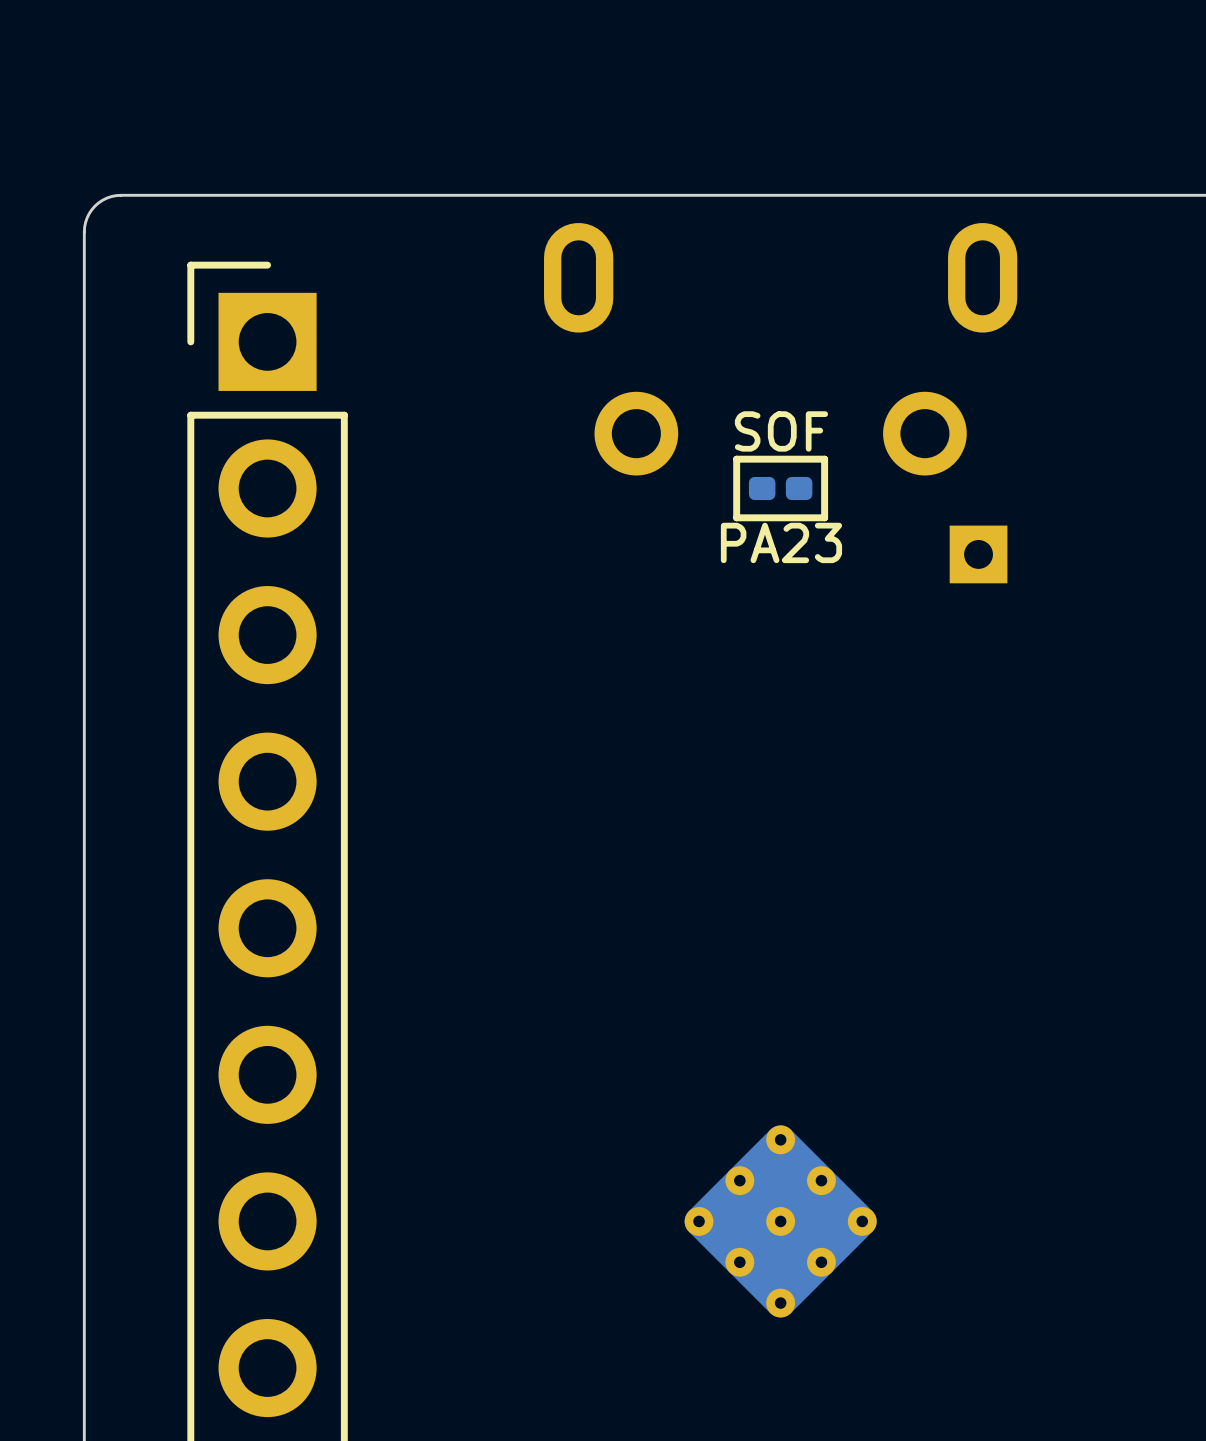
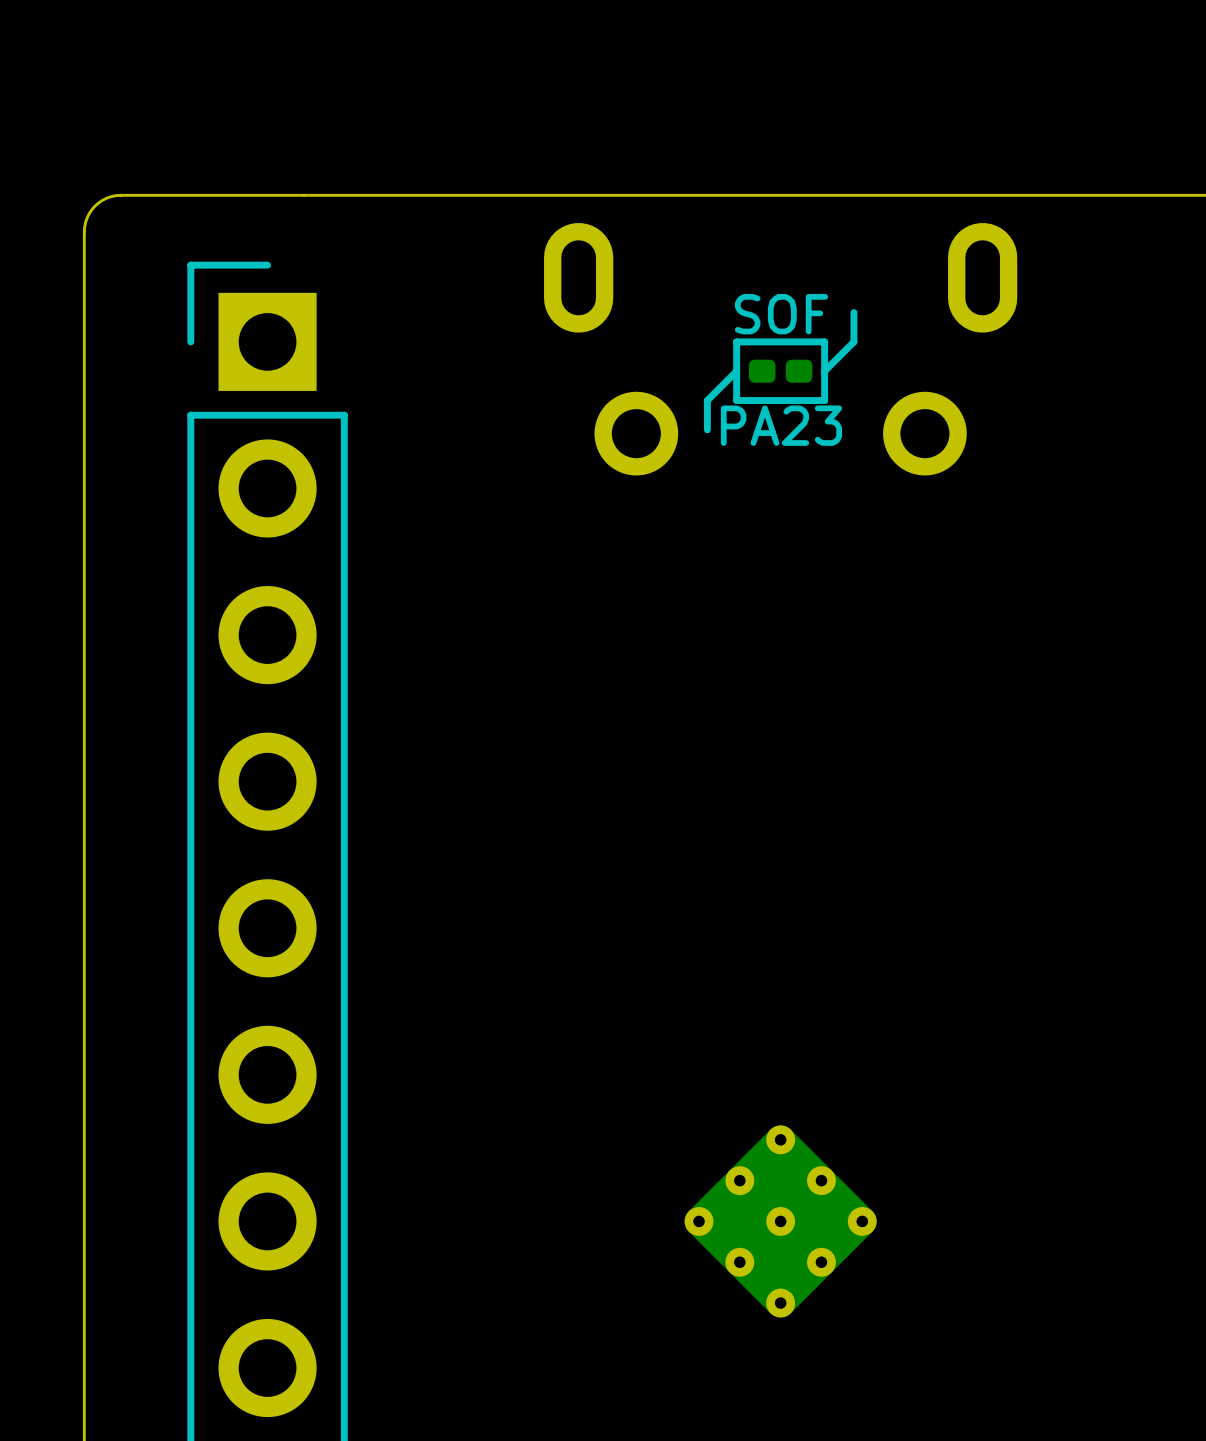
line: none -> (853, 312) (853, 341) (824, 371)
text: none -> SOF (781, 314)
line: none -> (736, 371) (707, 400) (707, 429)
text: SOF (781, 431) -> PA23 (781, 425)
line: (824, 459) (736, 459) (736, 517) (824, 517) (824, 459) -> (824, 341) (736, 341) (736, 400) (824, 400) (824, 341)
part position: (780, 488) -> (780, 371)
text: PA23 (781, 542) -> none
part: (978, 554) -> none

